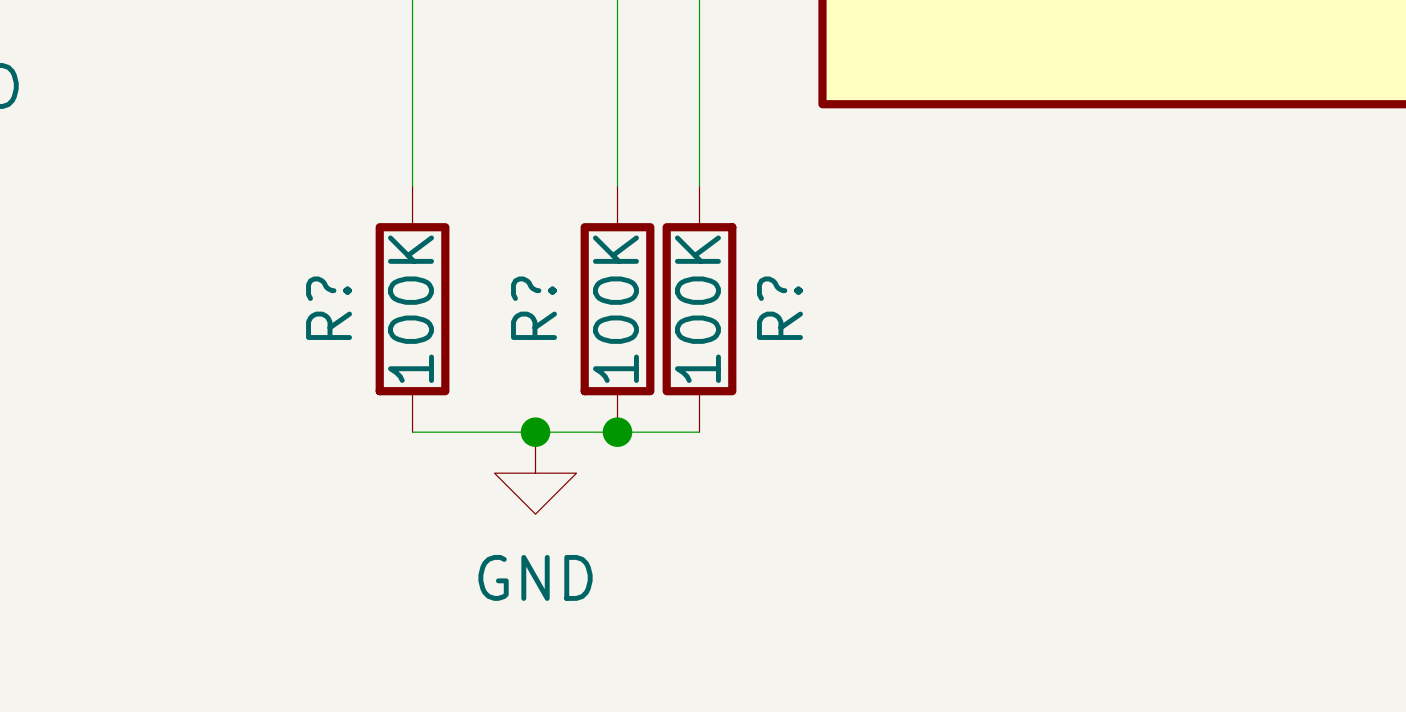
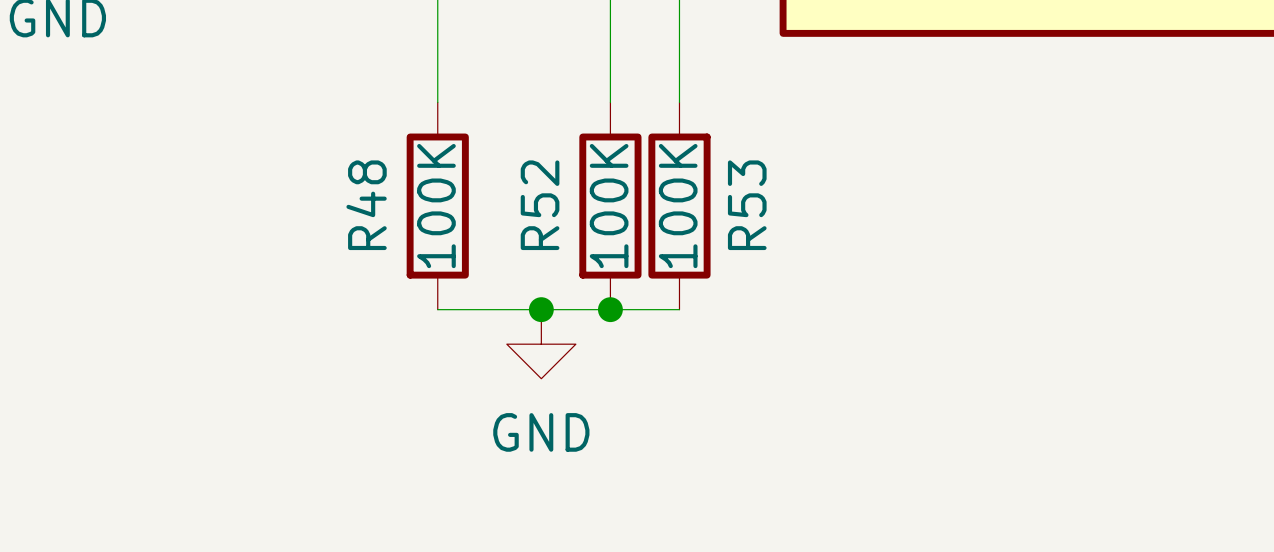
R? name: R? (329, 308) -> R48 (366, 205)
R? name: R? (533, 308) -> R52 (540, 205)
R? name: R? (779, 308) -> R53 (747, 205)

